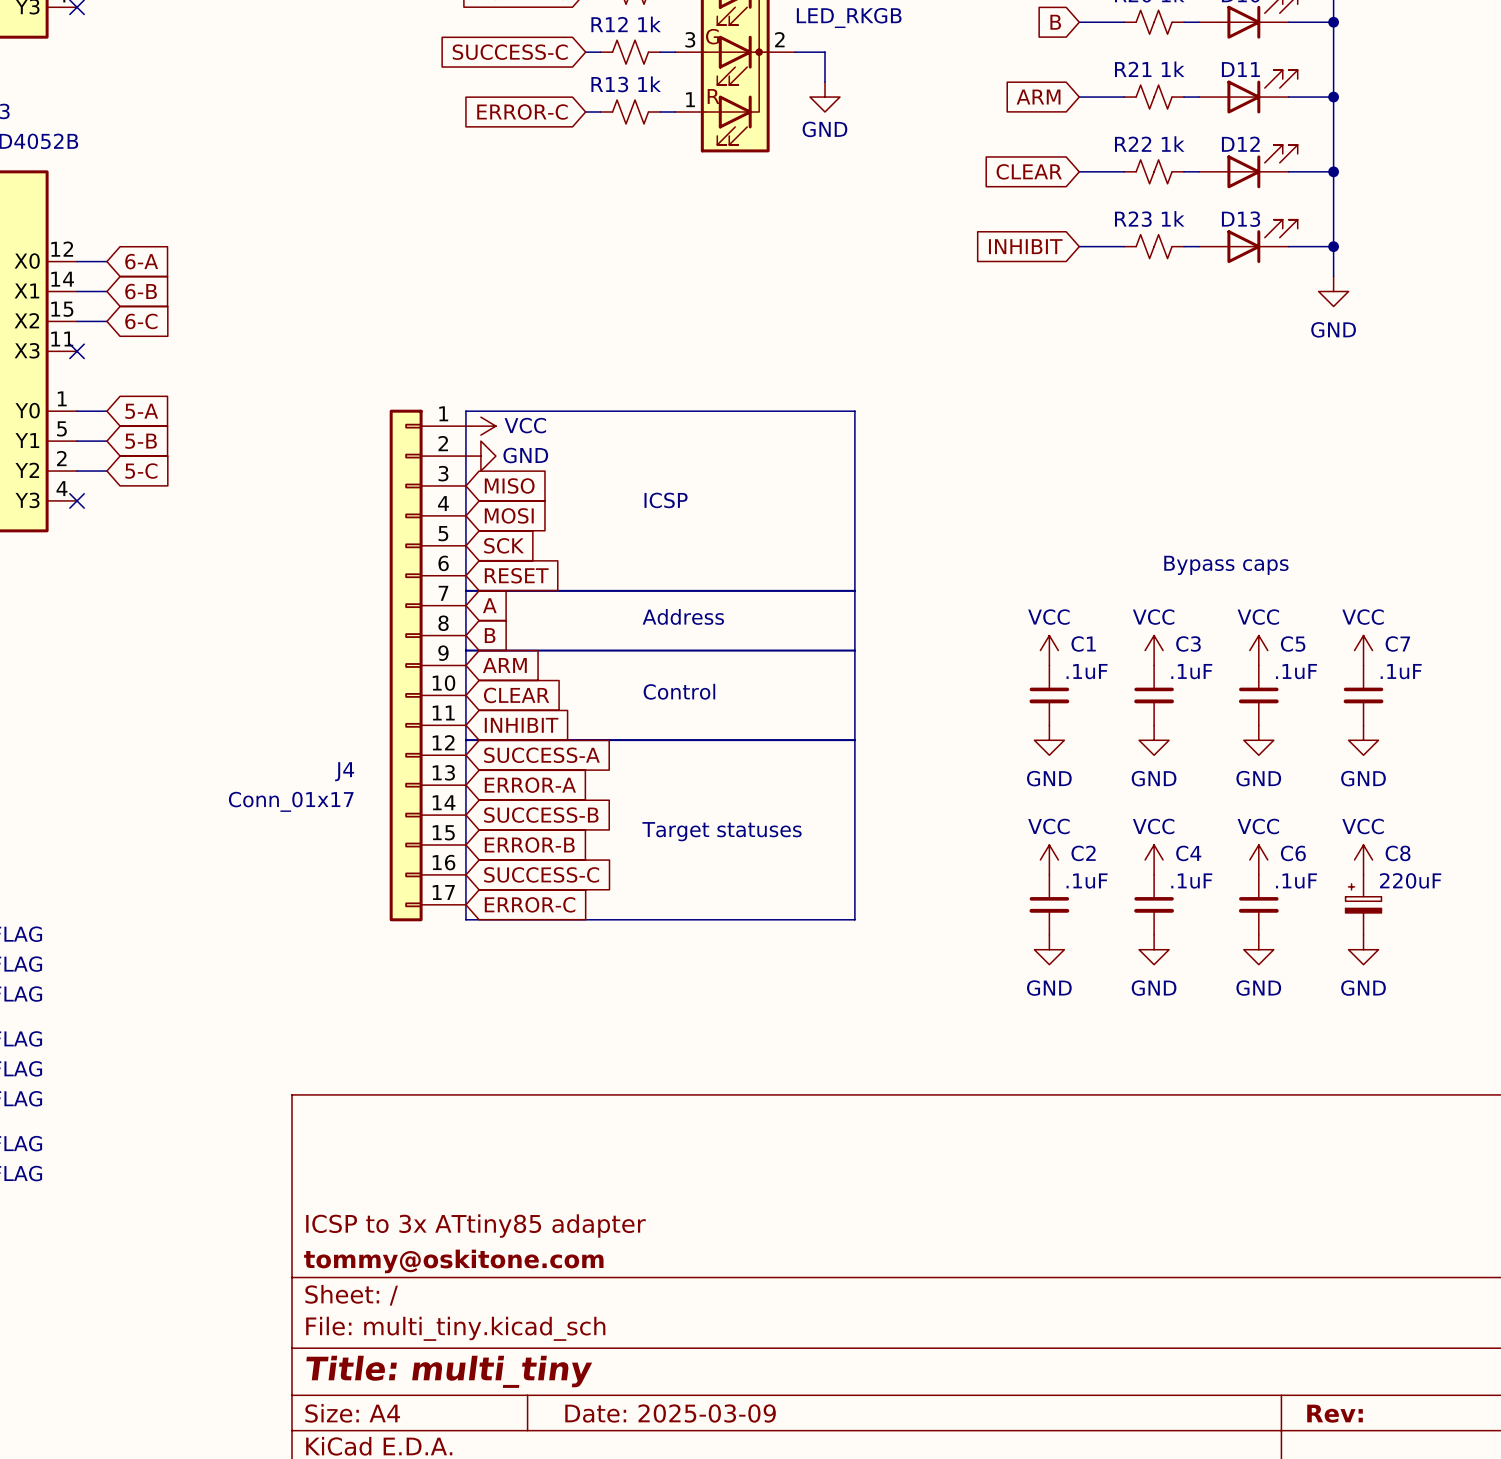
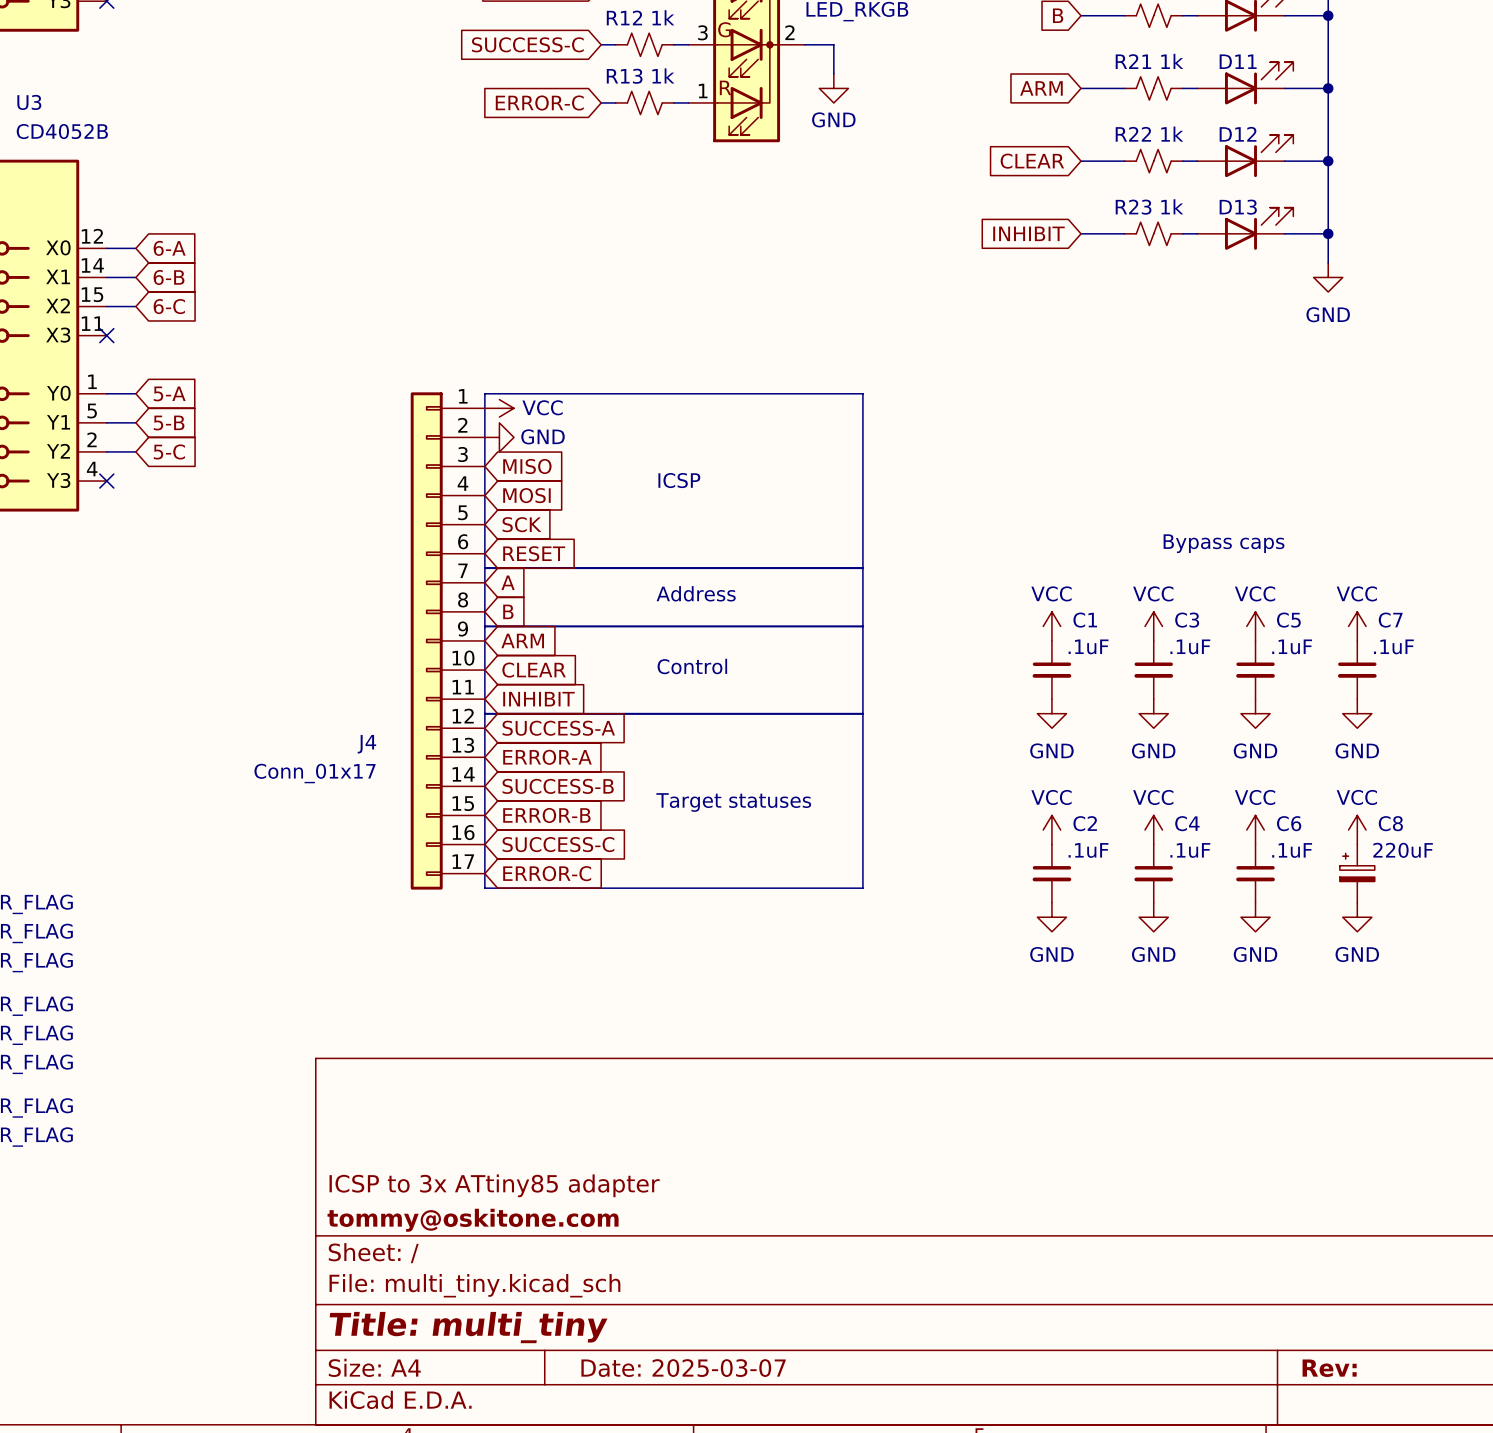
title block: Date: 2025-03-09 (670, 1413) -> Date: 2025-03-07 (683, 1368)

